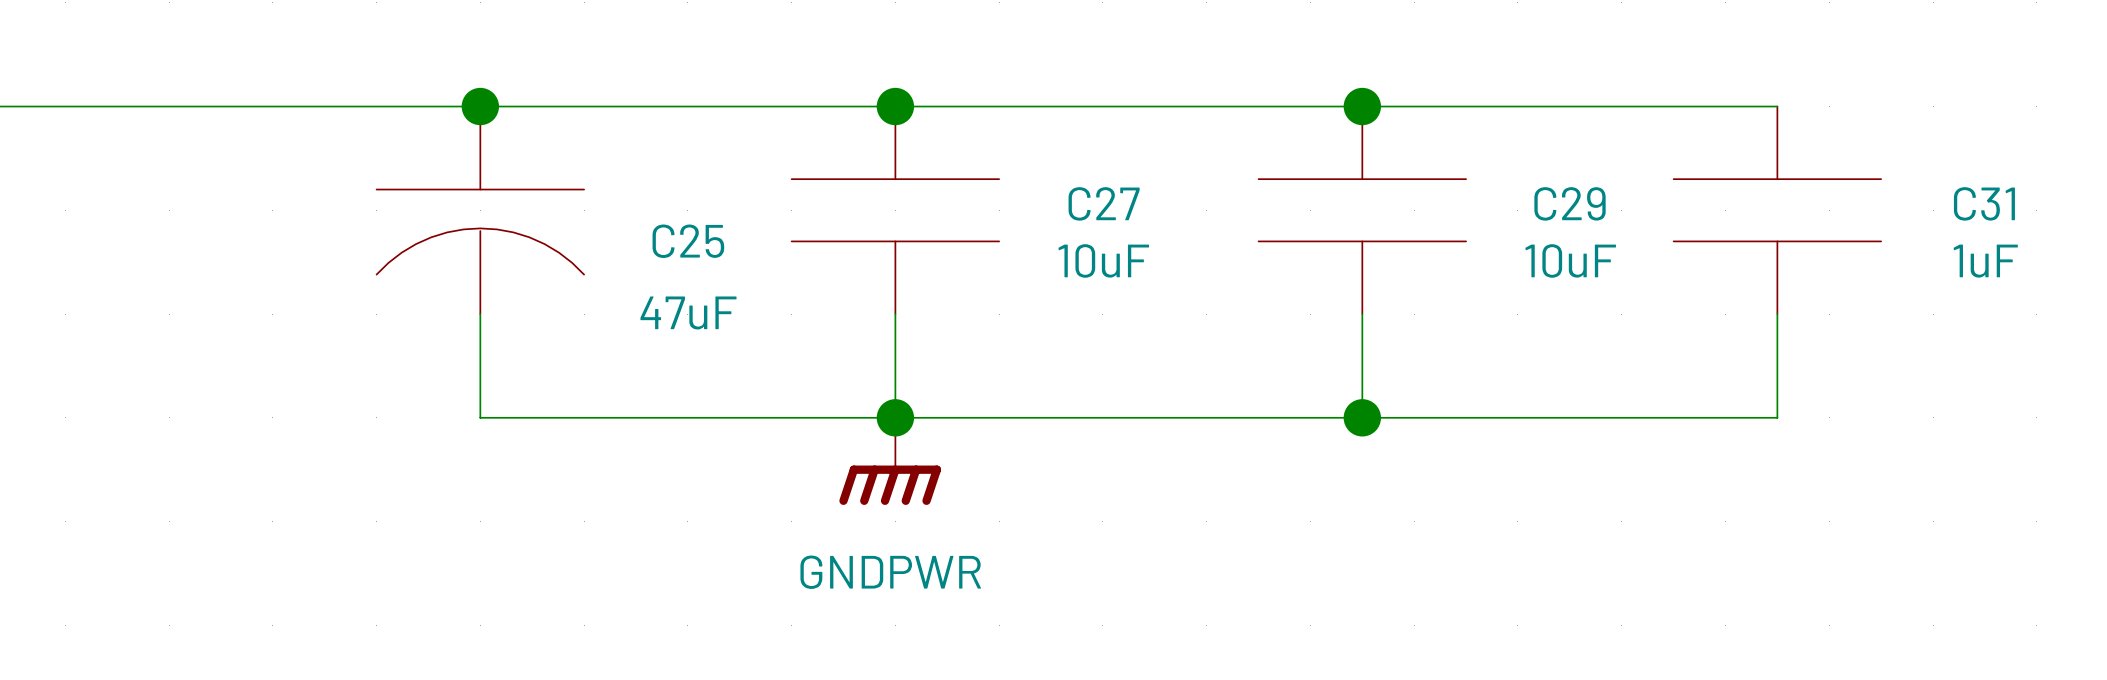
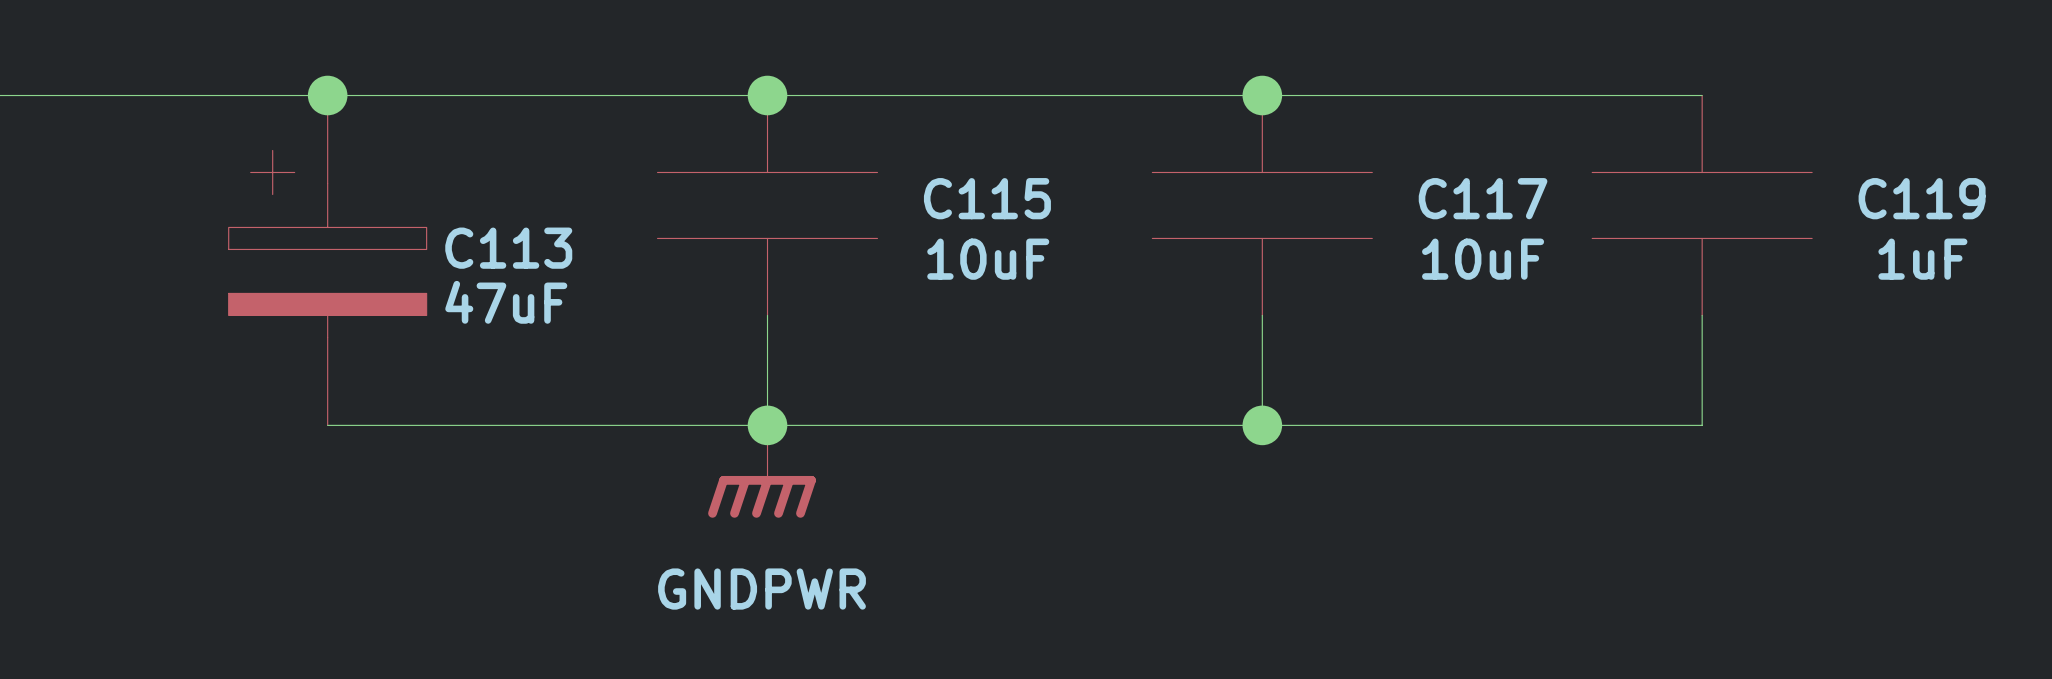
C27 name: C27 (1104, 203) -> C115 (987, 198)
C29 name: C29 (1570, 203) -> C117 (1483, 198)
C31 name: C31 (1984, 203) -> C119 (1922, 198)
C25: 47uF (480, 210) -> none
C113: none -> 47uF (327, 260)

